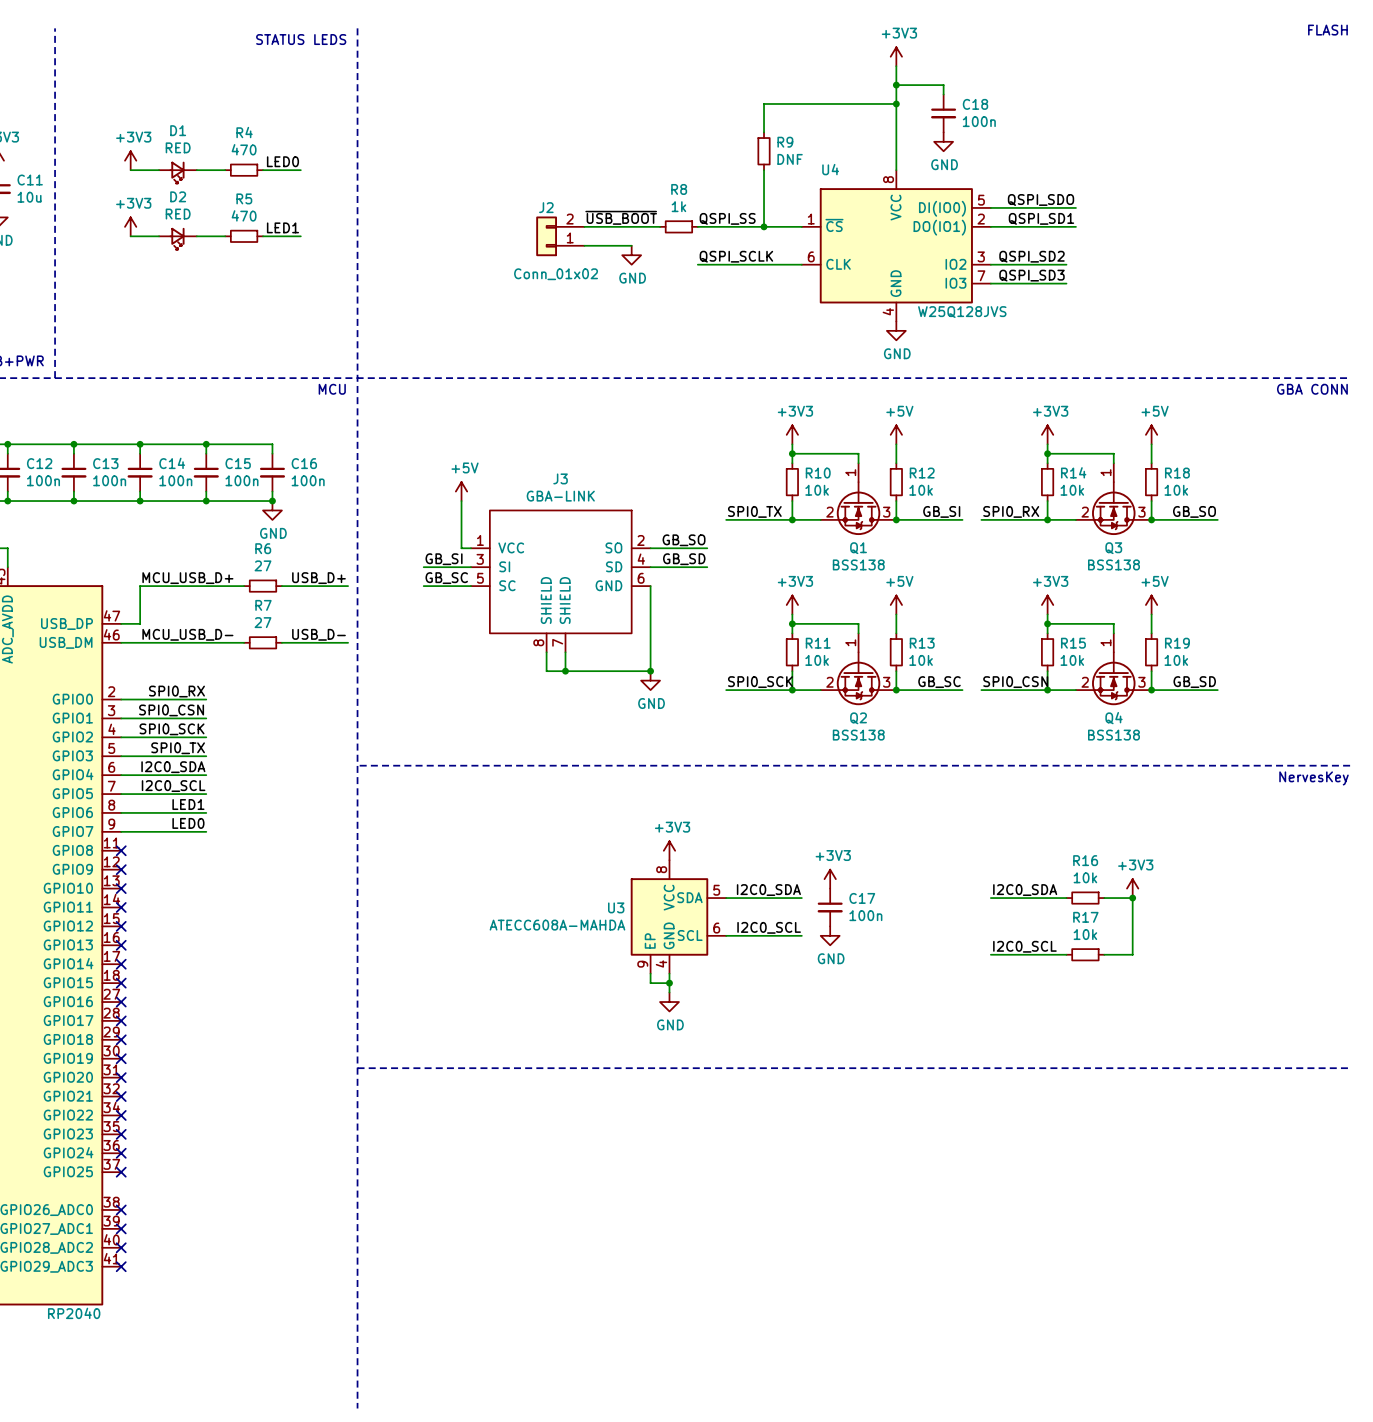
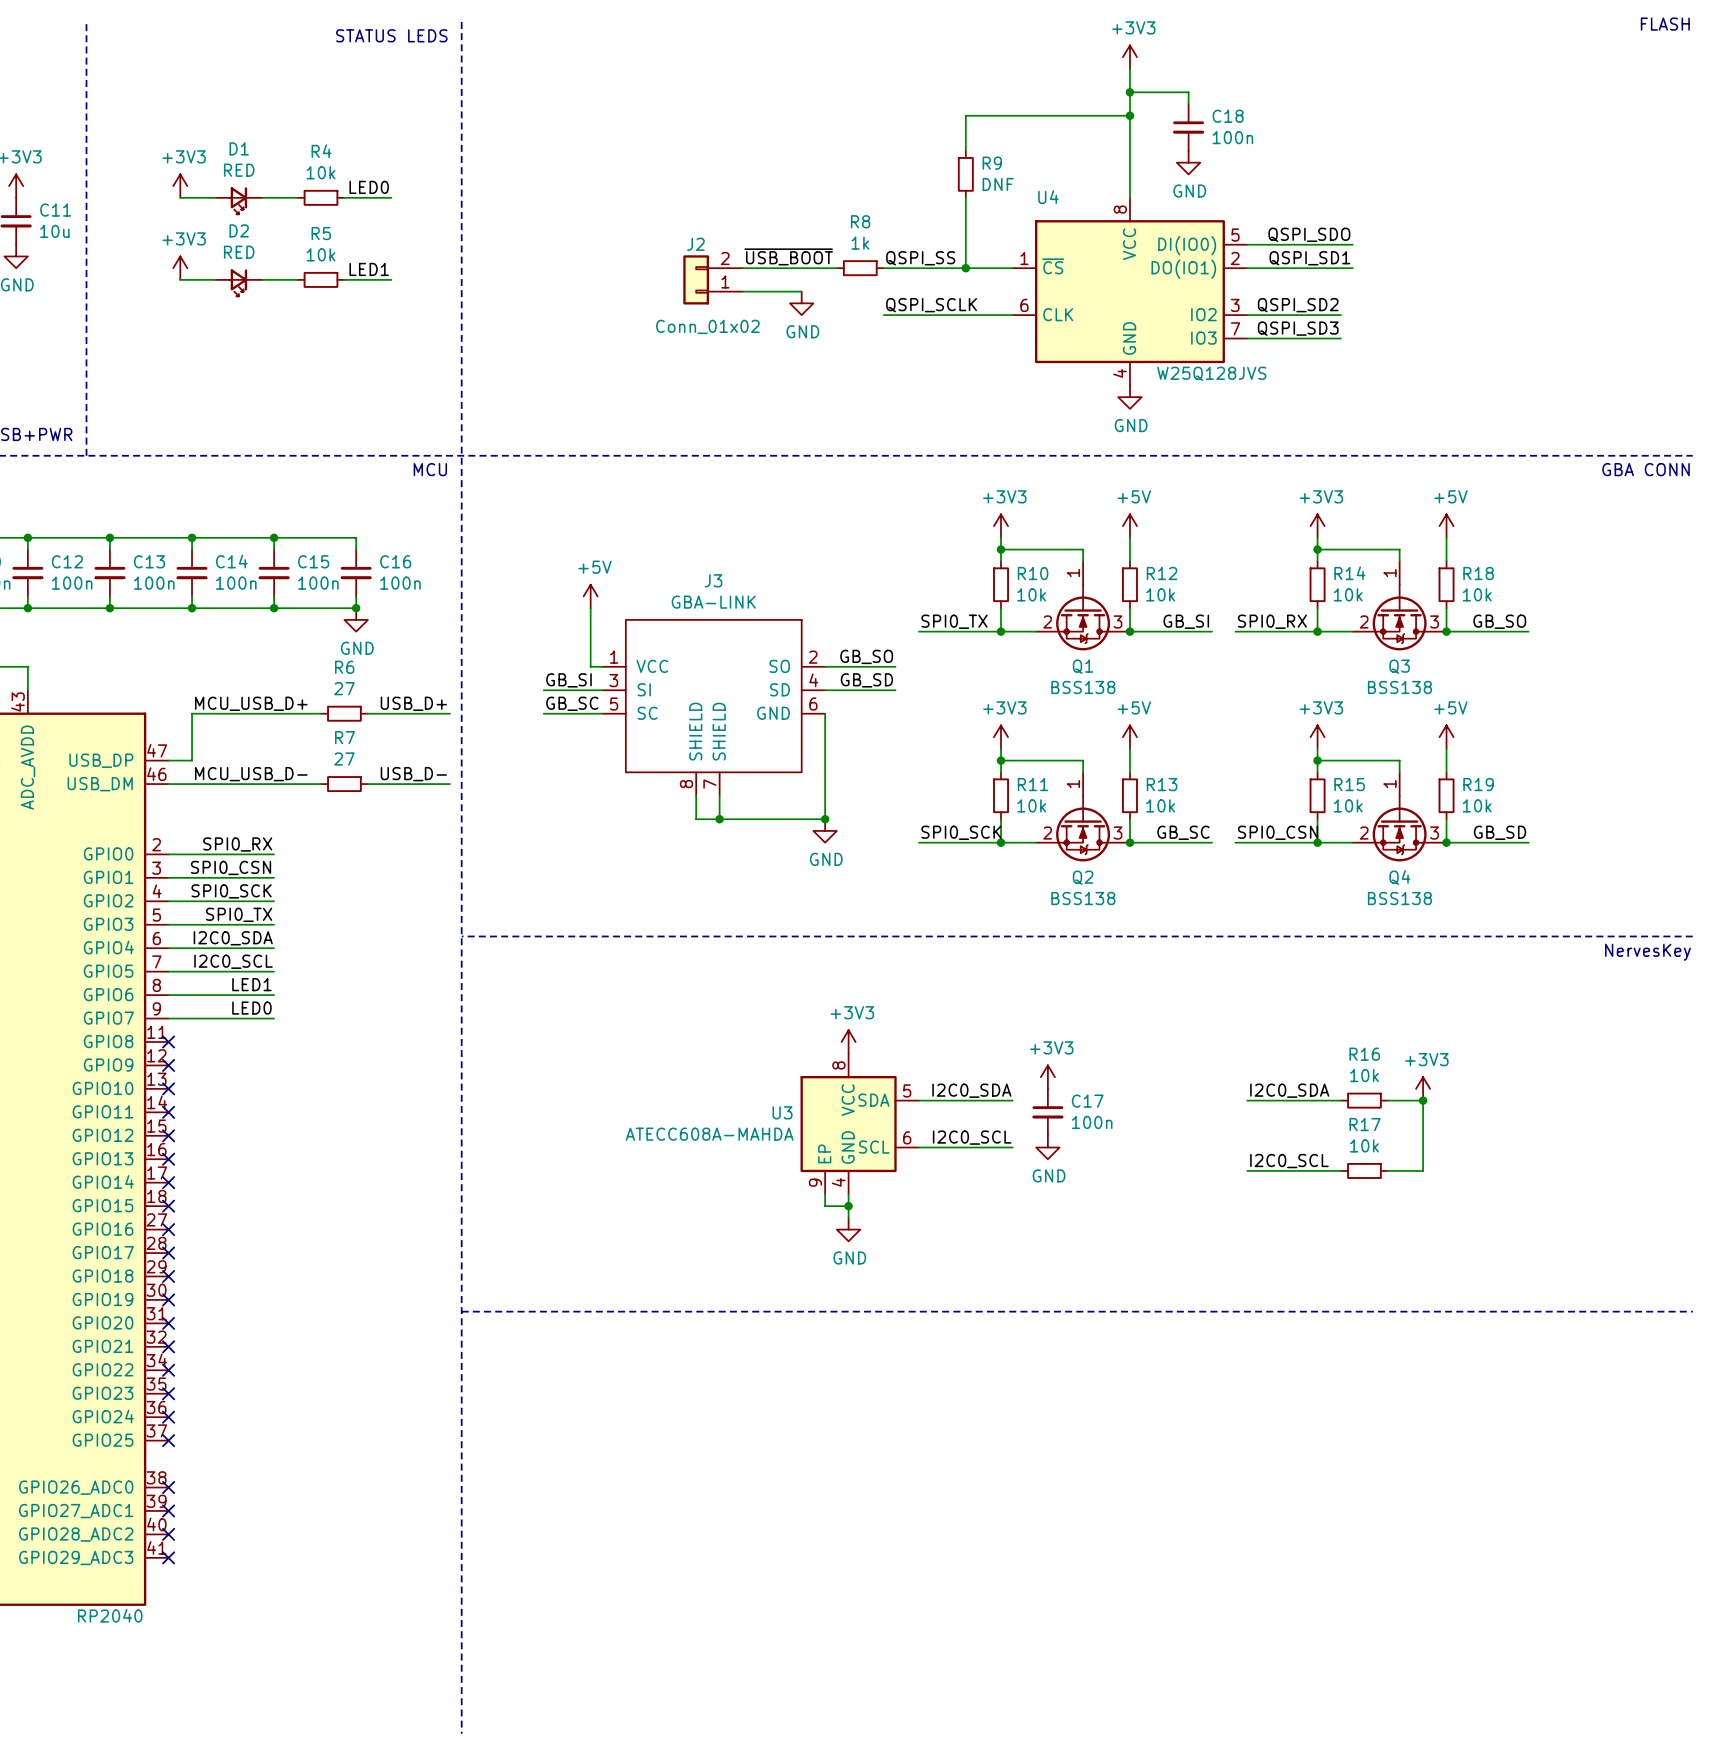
R4 value: 470 (244, 149) -> 10k (320, 172)
R5 value: 470 (244, 215) -> 10k (320, 254)

